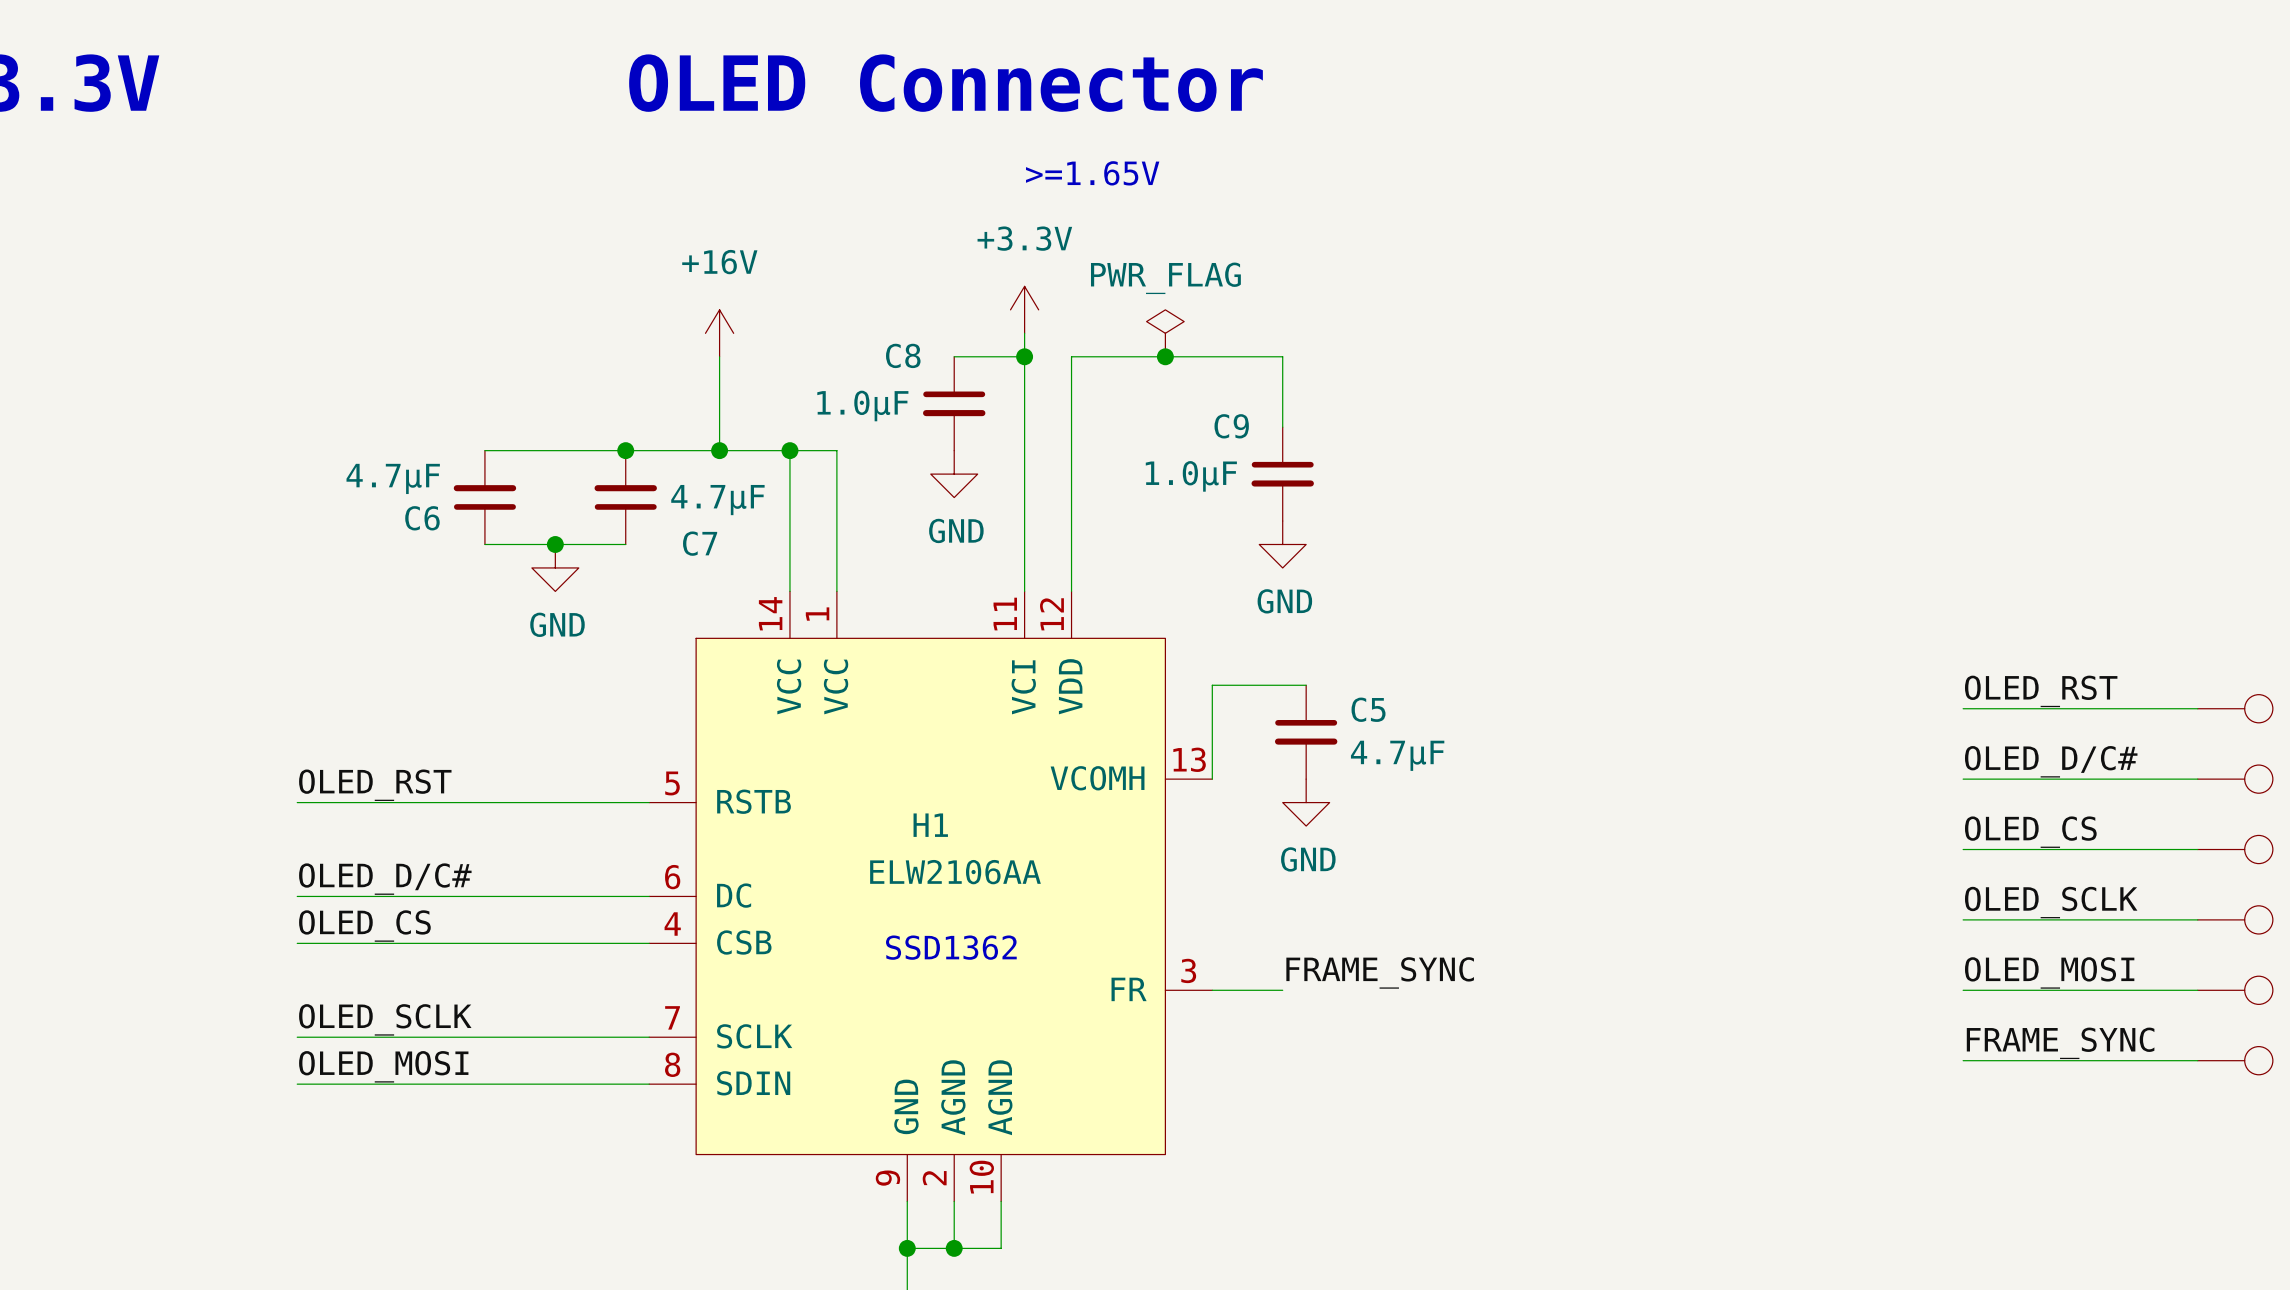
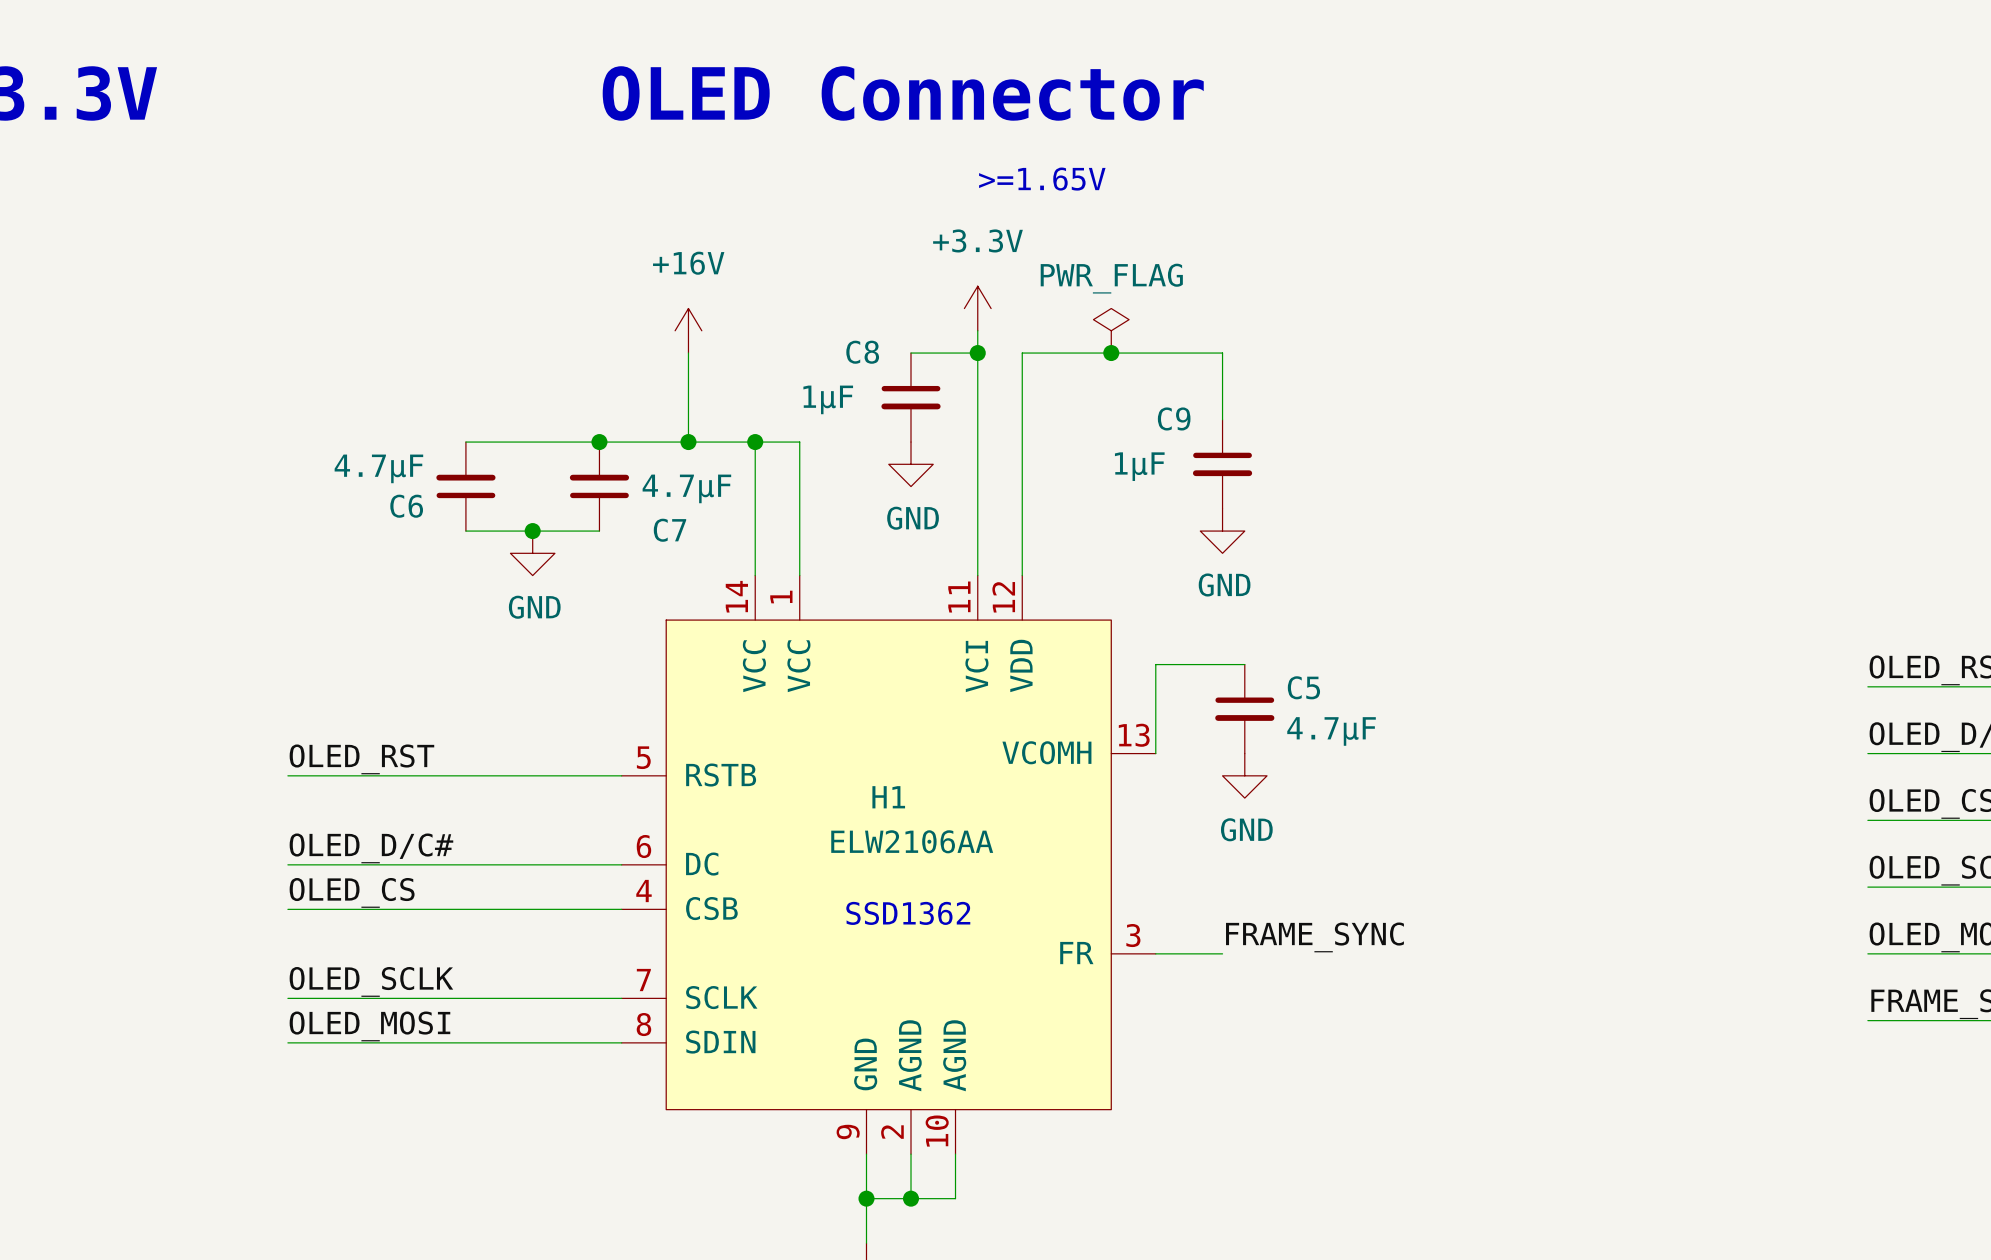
C8 value: 1.0µF (862, 405) -> 1µF (828, 399)
C9 value: 1.0µF (1191, 476) -> 1µF (1139, 466)

